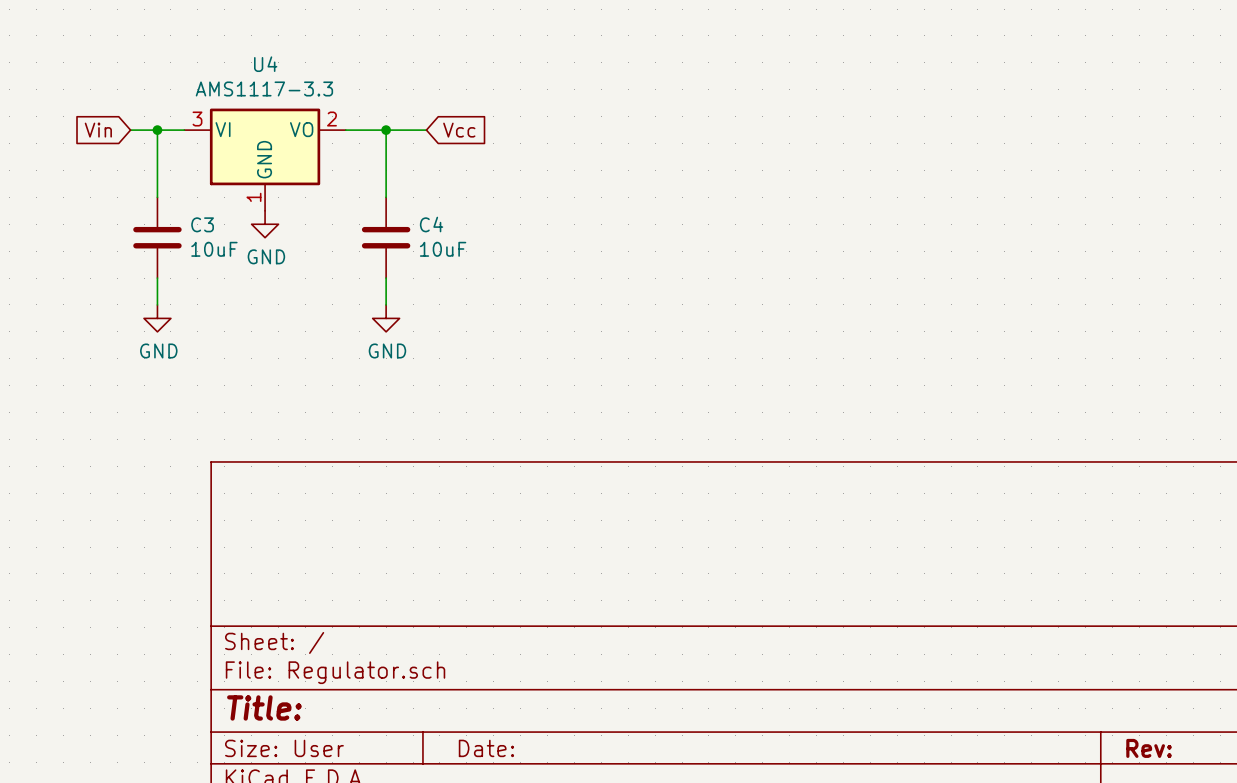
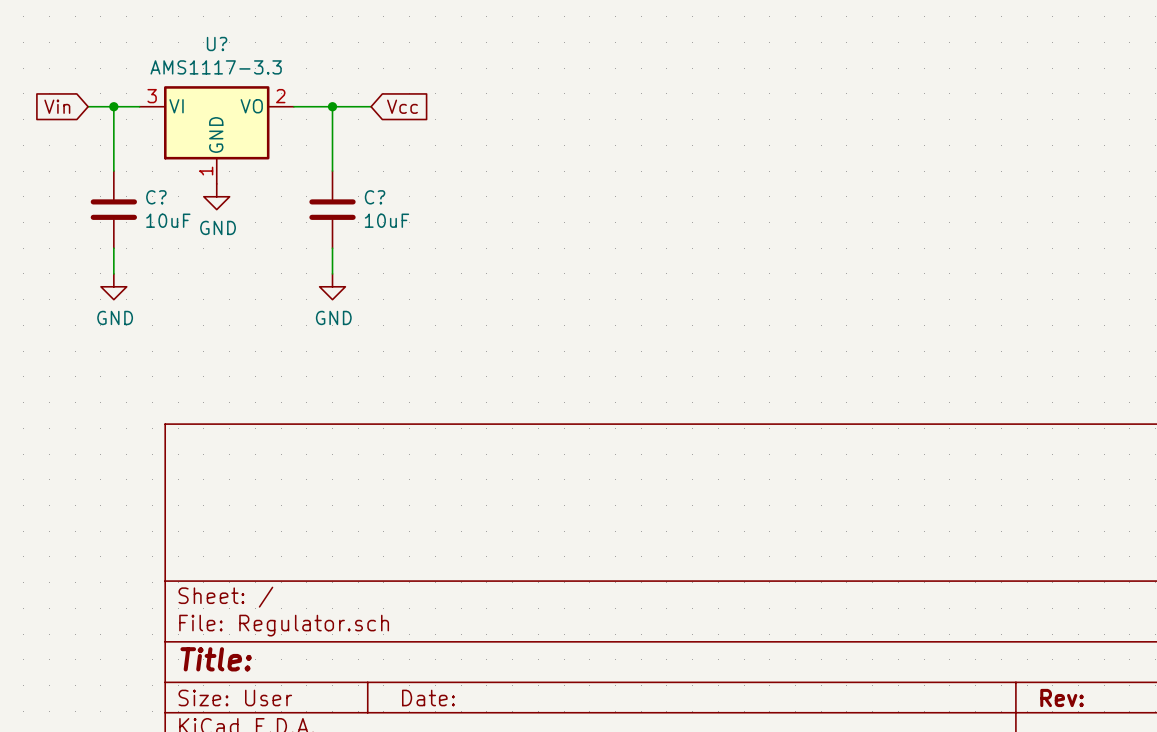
U4 name: U4 (265, 64) -> U? (217, 44)
C3 name: C3 (202, 224) -> C? (156, 197)
C4 name: C4 (431, 224) -> C? (375, 197)

